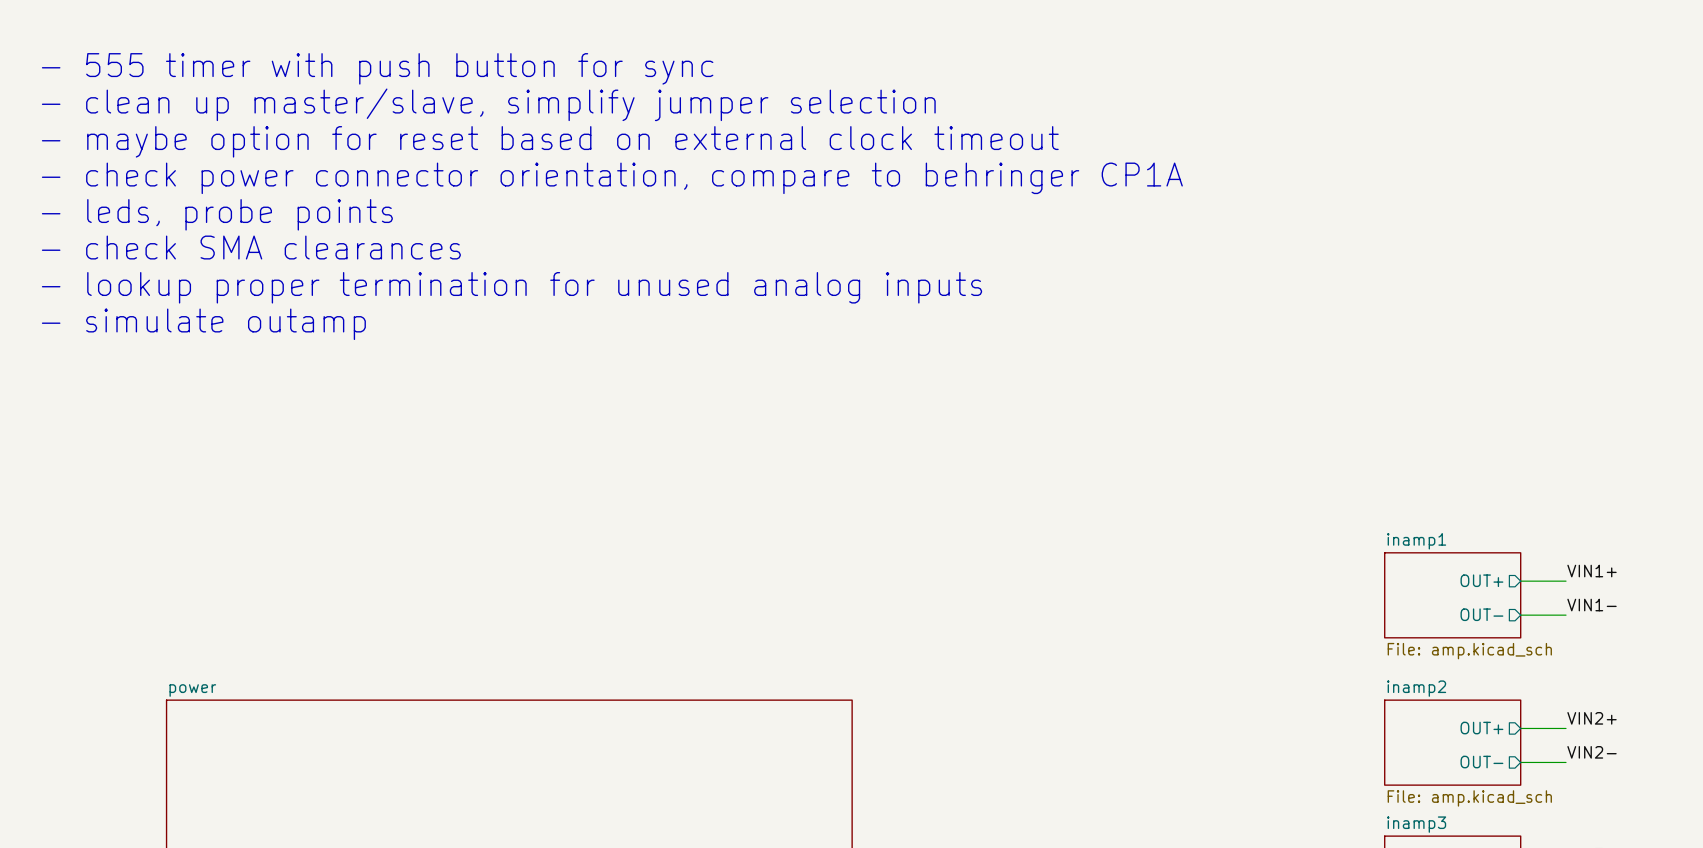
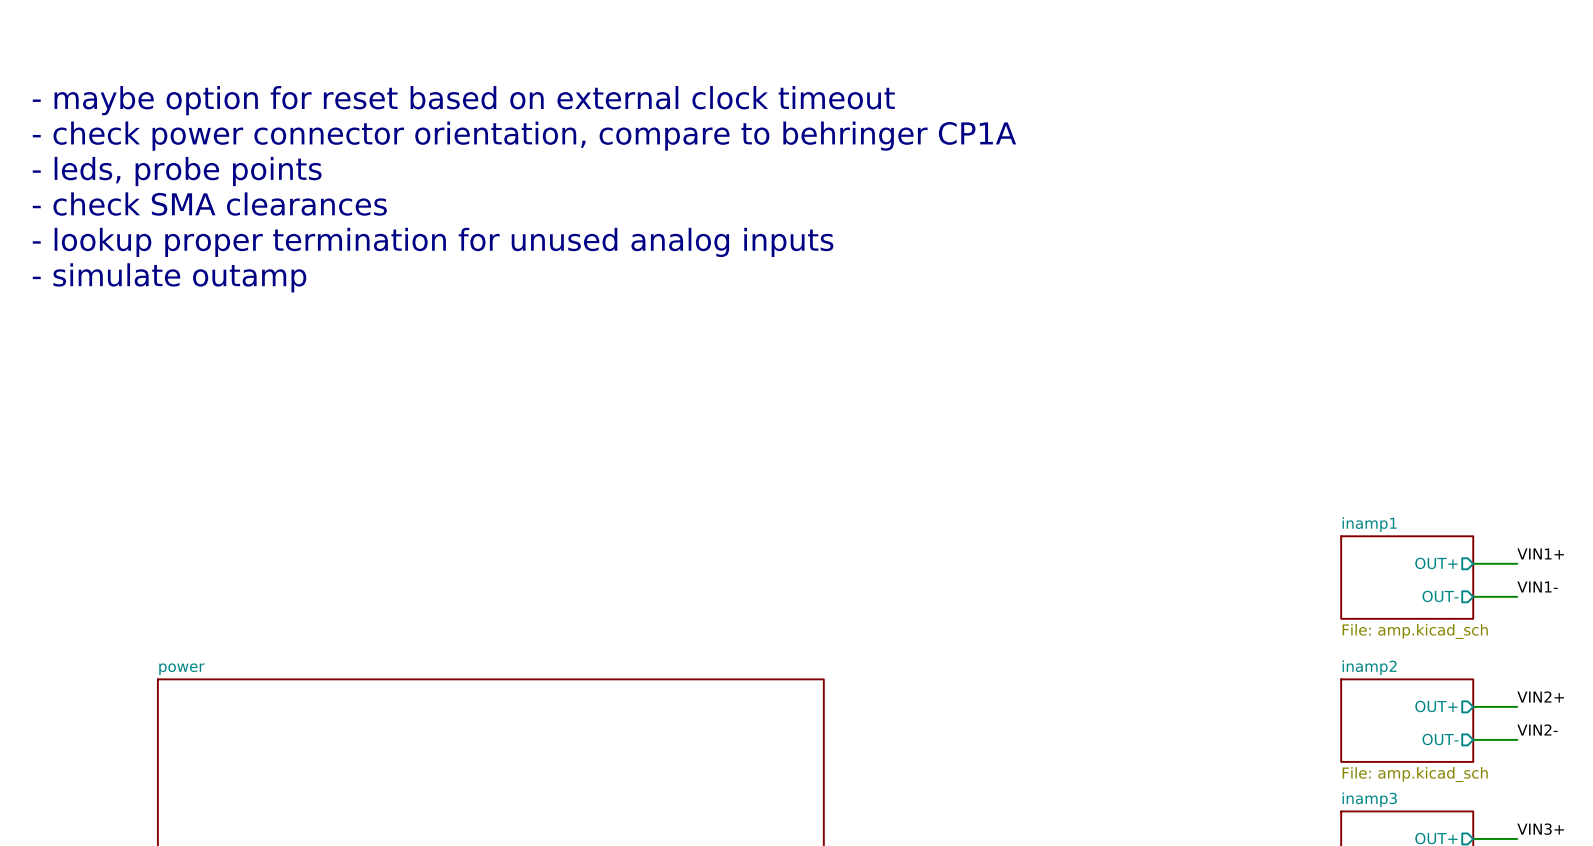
text: - 555 timer with push button for sync (377, 68) -> none
text: - clean up master/slave, simplify jumper selection (488, 104) -> - maybe option for reset based on external clock timeout (463, 100)
text: - maybe option for reset based on external clock timeout (550, 141) -> - check power connector orientation, compare to behringer CP1A (524, 136)
text: - check power connector orientation, compare to behringer CP1A (612, 178) -> - leds, probe points (177, 171)
text: - leds, probe points (217, 214) -> - check SMA clearances (209, 204)
text: - check SMA clearances (251, 247) -> - lookup proper termination for unused analog inputs (433, 242)
text: - lookup proper termination for unused analog inputs (511, 287) -> - simulate outamp (169, 277)
text: - simulate outamp (203, 324) -> none

